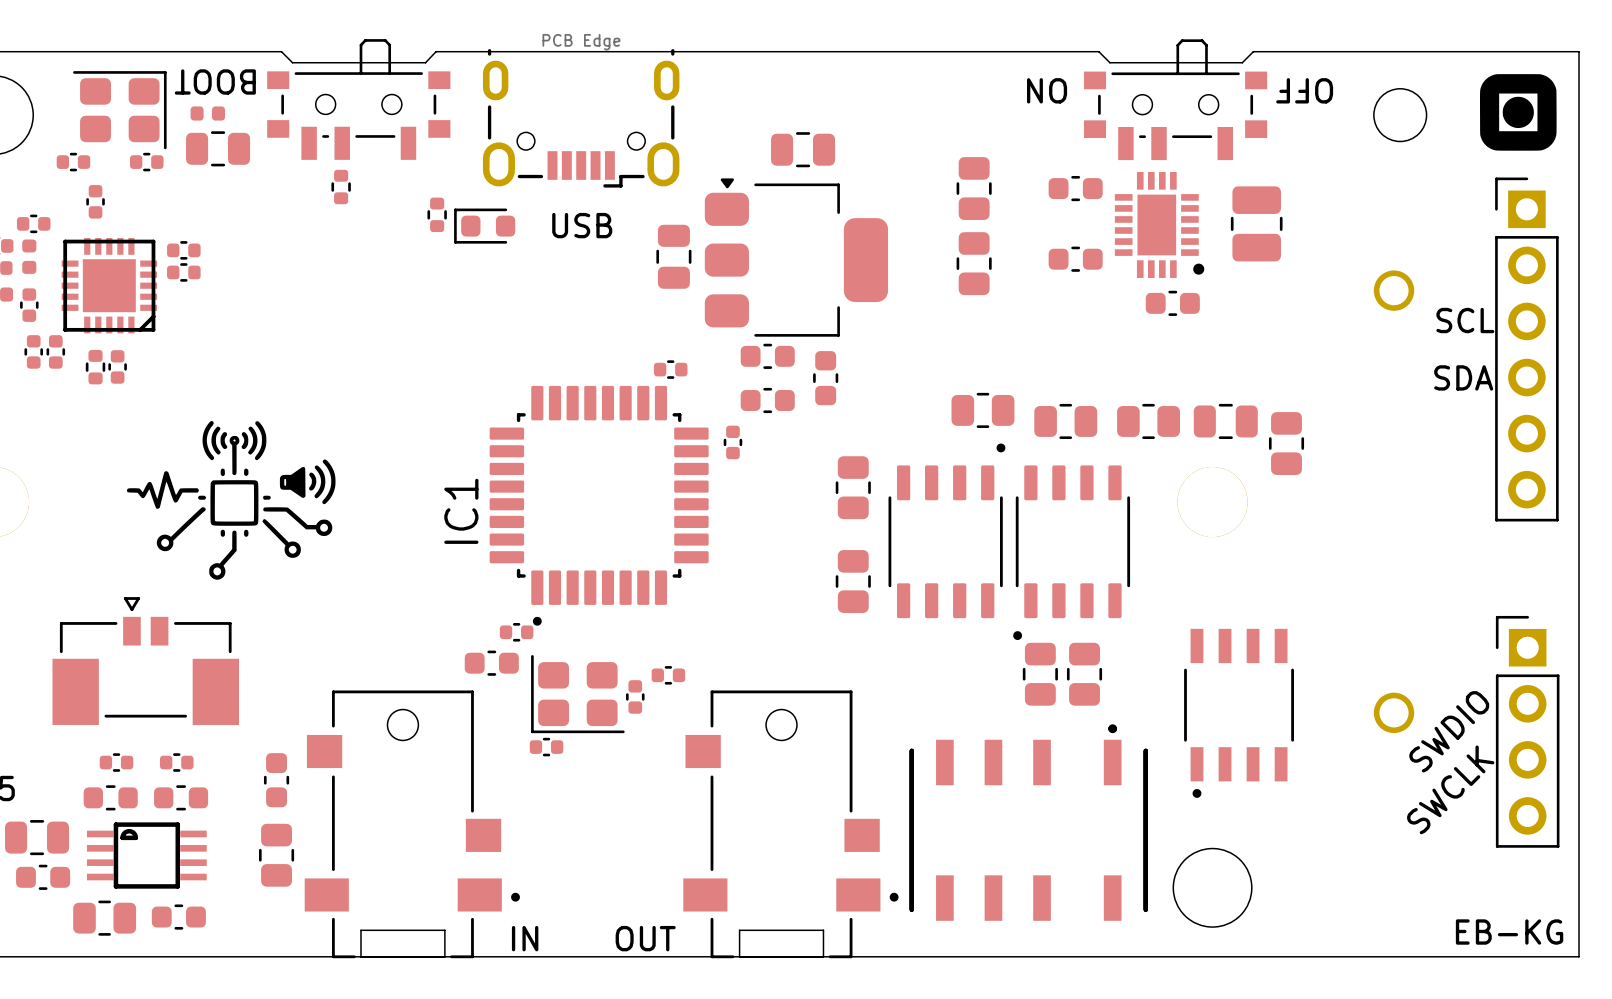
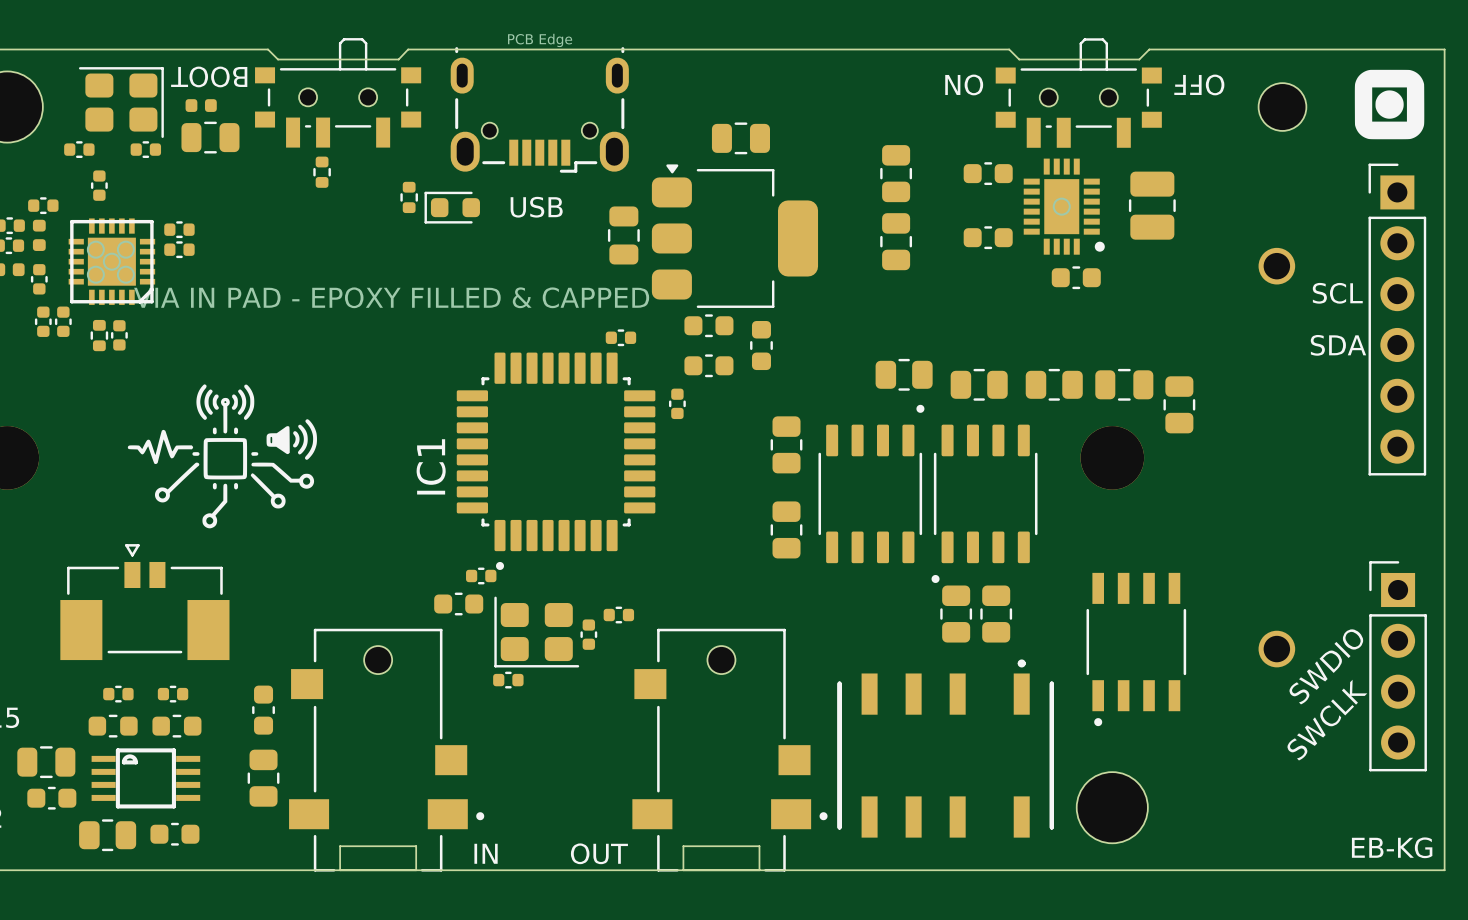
drawing: none -> [1052, 197, 1071, 216]
drawing: none -> [86, 240, 135, 284]
text: none -> VIA IN PAD - EPOXY FILLED & CAPPED (391, 297)

